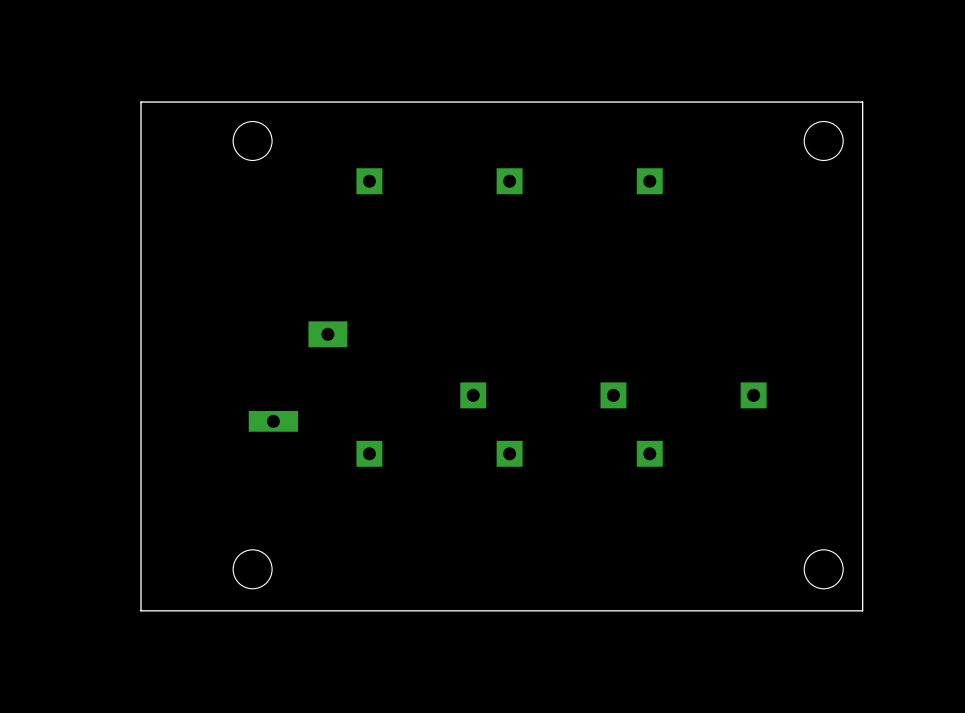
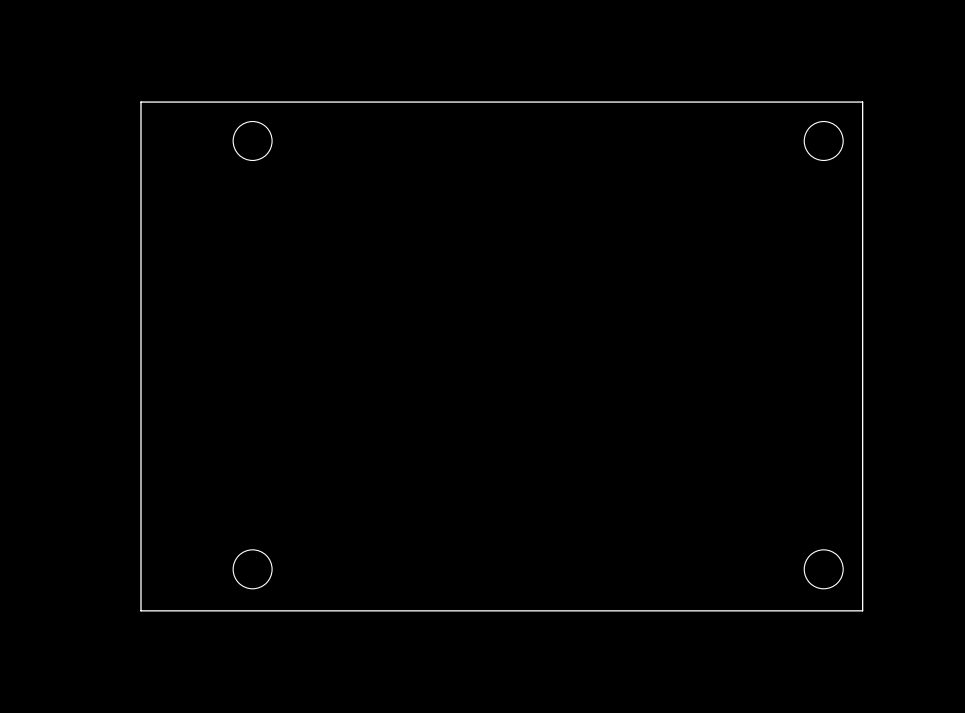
part: (369, 181) -> none
part: (509, 181) -> none
part: (649, 181) -> none
part: (327, 334) -> none
part: (473, 395) -> none
part: (613, 395) -> none
part: (753, 395) -> none
part: (273, 421) -> none
part: (369, 453) -> none
part: (509, 453) -> none
part: (649, 453) -> none

